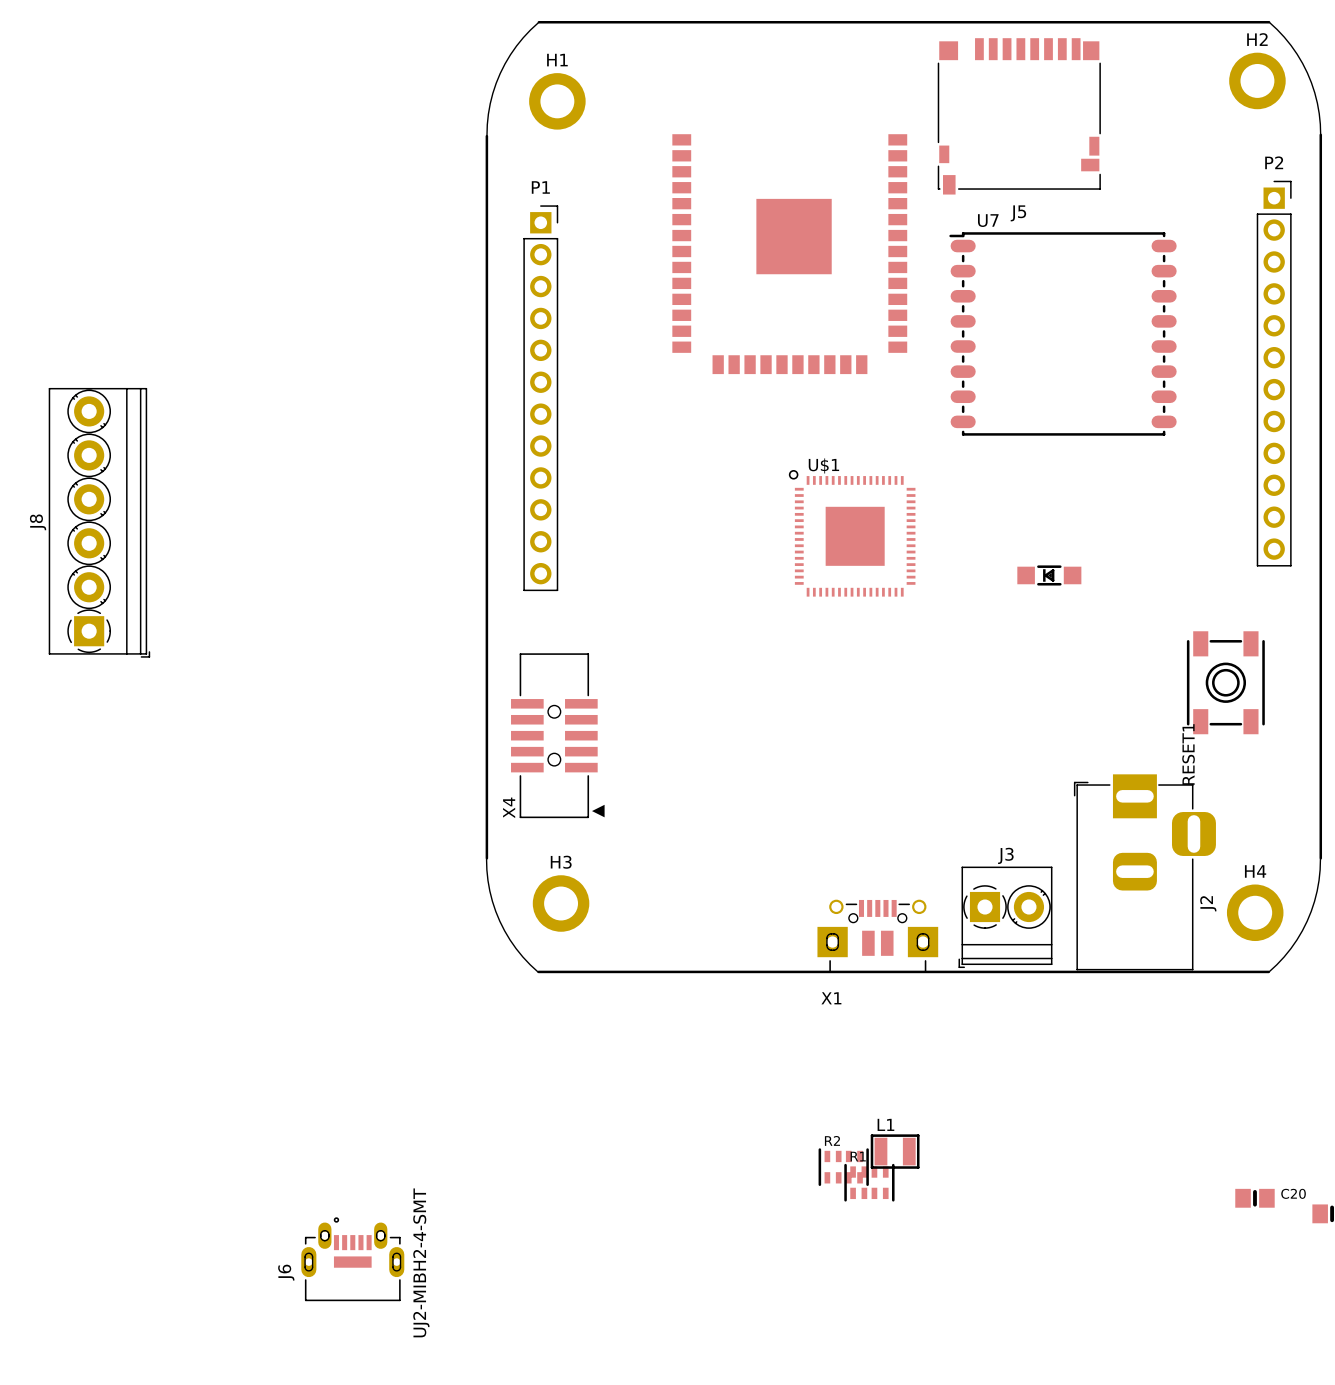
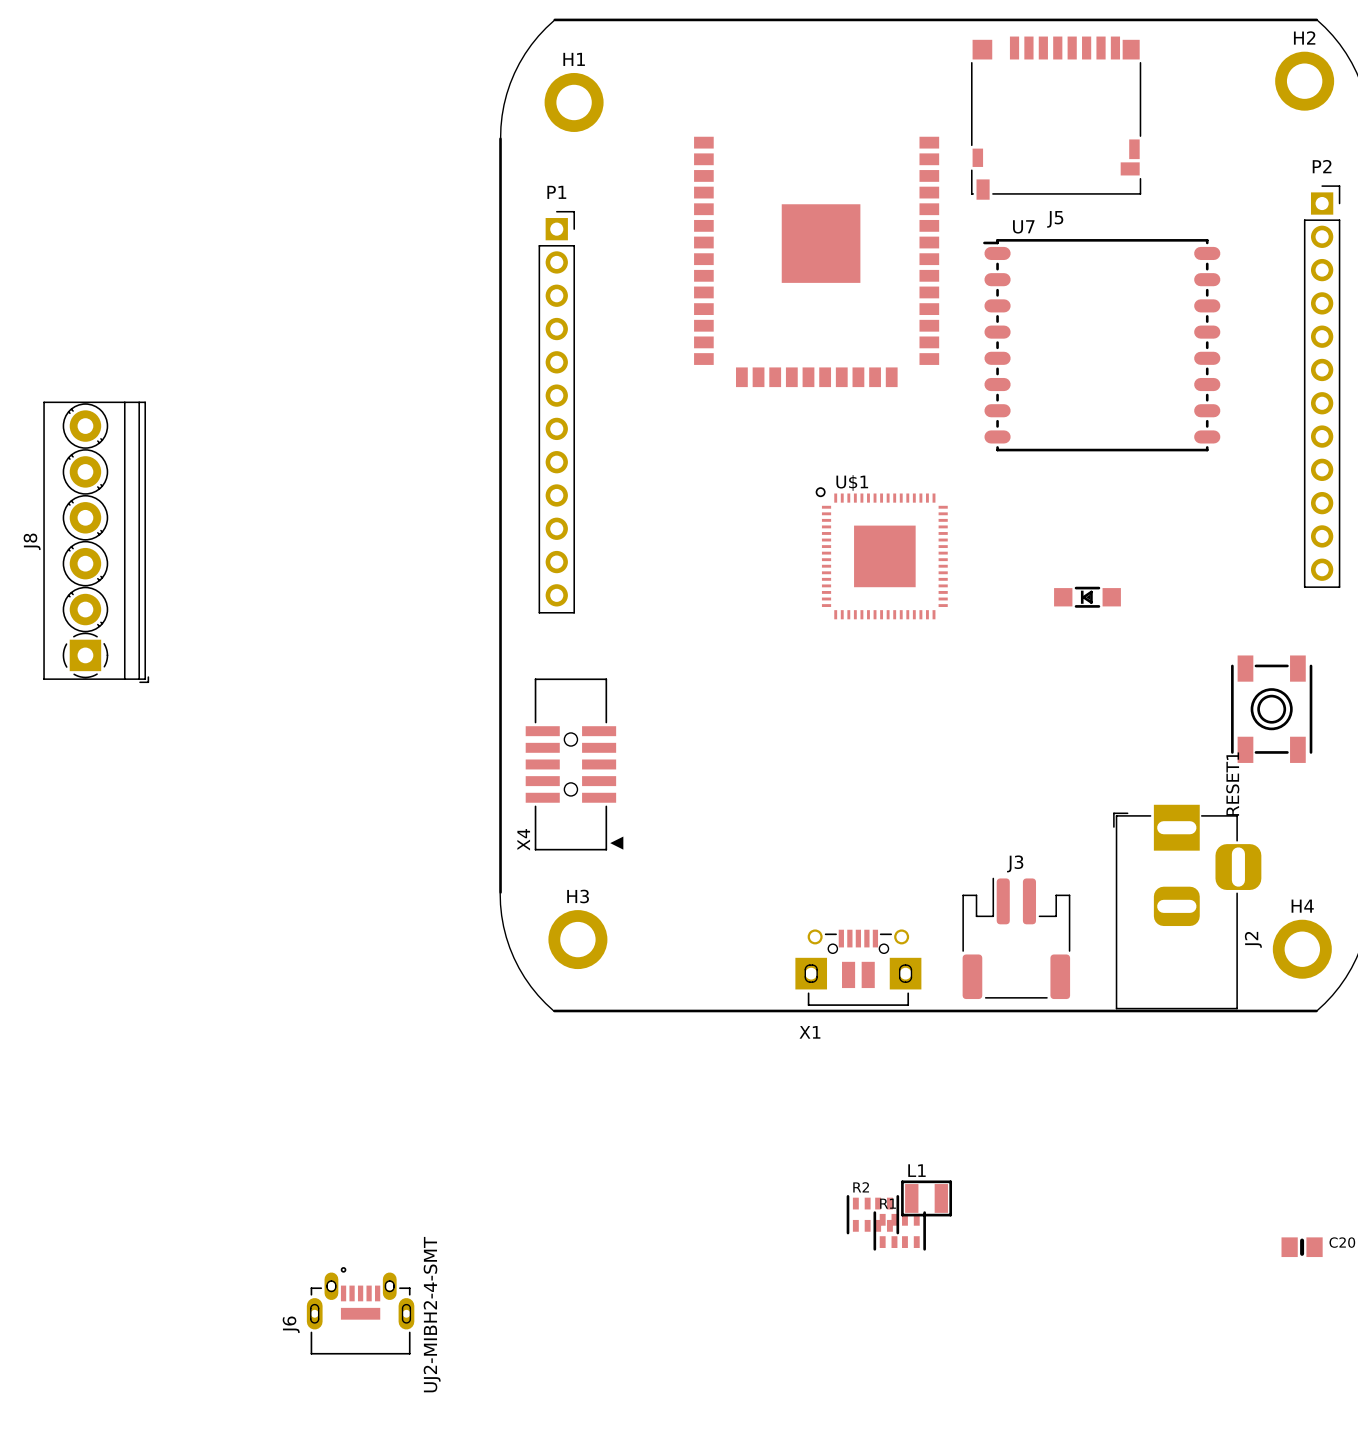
J3 footprint: [958, 866, 1053, 969] -> [962, 877, 1071, 1000]
X1 position: (877, 936) -> (858, 967)

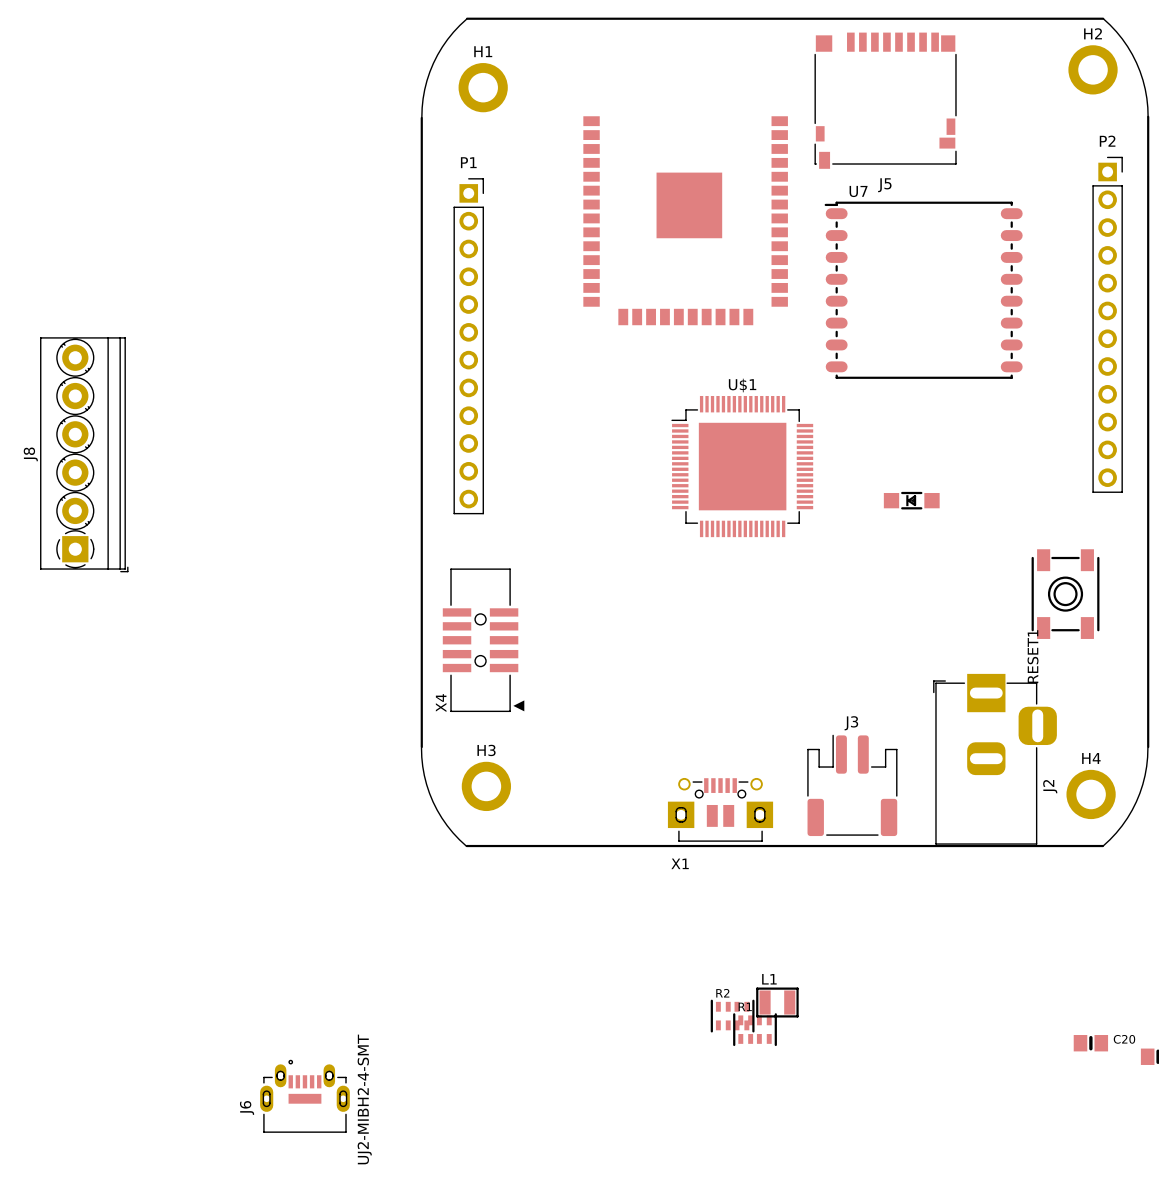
U$1 name position: U$1 (852, 482) -> U$1 (742, 385)
U$1 footprint: [815, 487, 948, 620] -> [671, 395, 814, 538]

